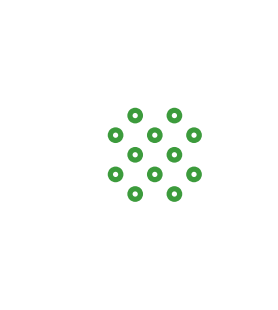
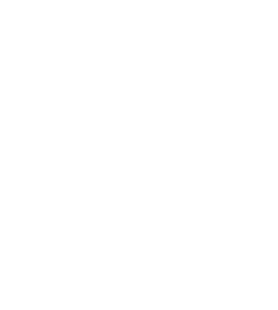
part: (154, 154) -> none

